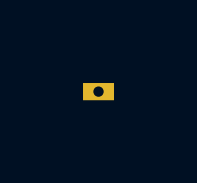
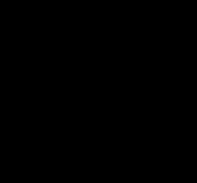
part: (98, 91) -> none

